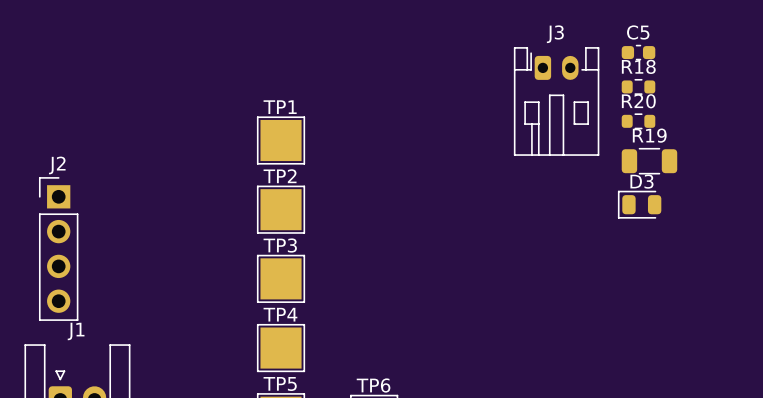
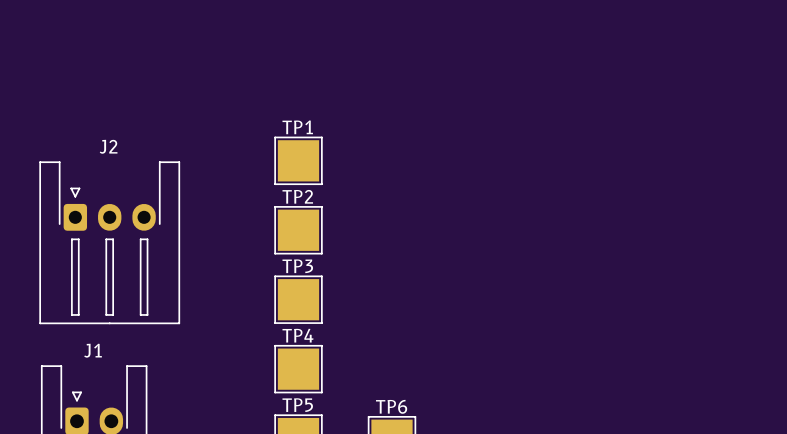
C5: (638, 52) -> none
R18: (638, 86) -> none
J3: (556, 101) -> none
R20: (638, 121) -> none
R19: (649, 161) -> none
J2 footprint: [38, 177, 79, 321] -> [39, 161, 181, 325]
D3: (639, 204) -> none

